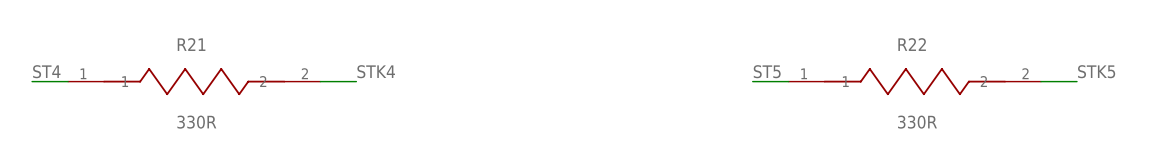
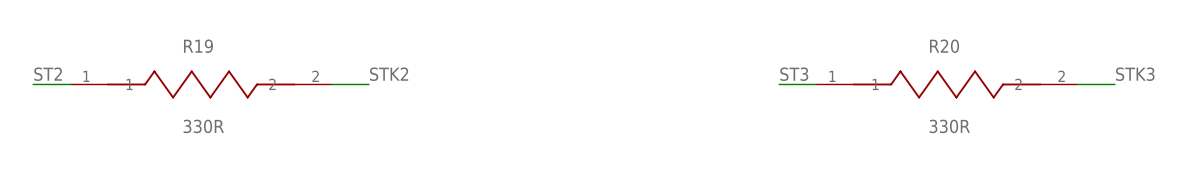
R21 name: R21 (191, 44) -> R19 (198, 46)
R22 name: R22 (912, 44) -> R20 (944, 46)
label: ST4 (46, 71) -> ST2 (48, 74)
label: STK4 (376, 71) -> STK2 (389, 74)
label: ST5 (767, 71) -> ST3 (794, 74)
label: STK5 (1096, 71) -> STK3 (1135, 74)

